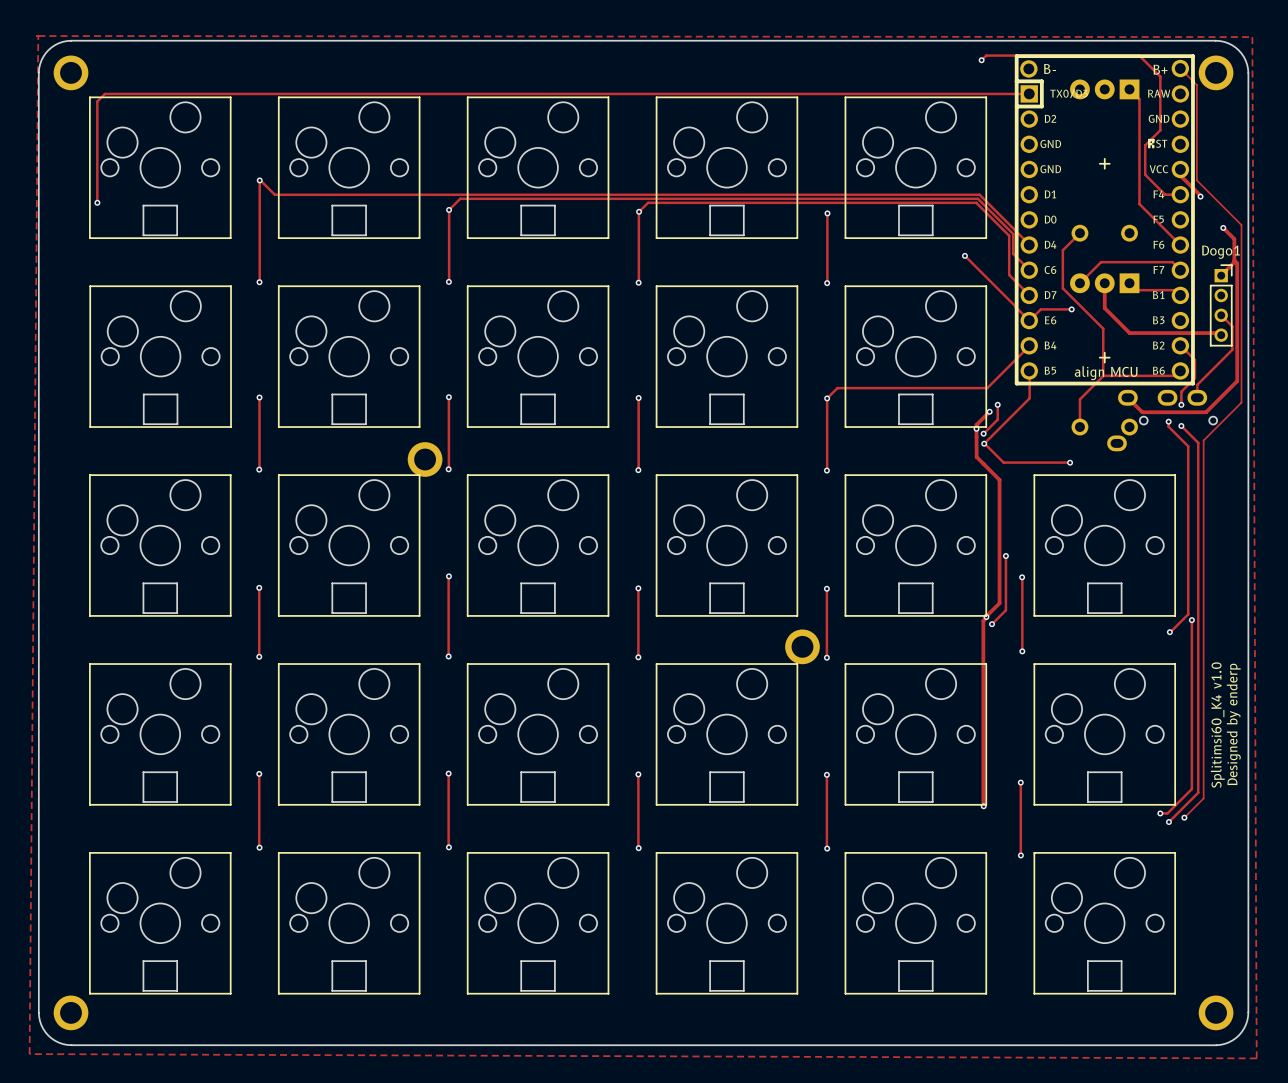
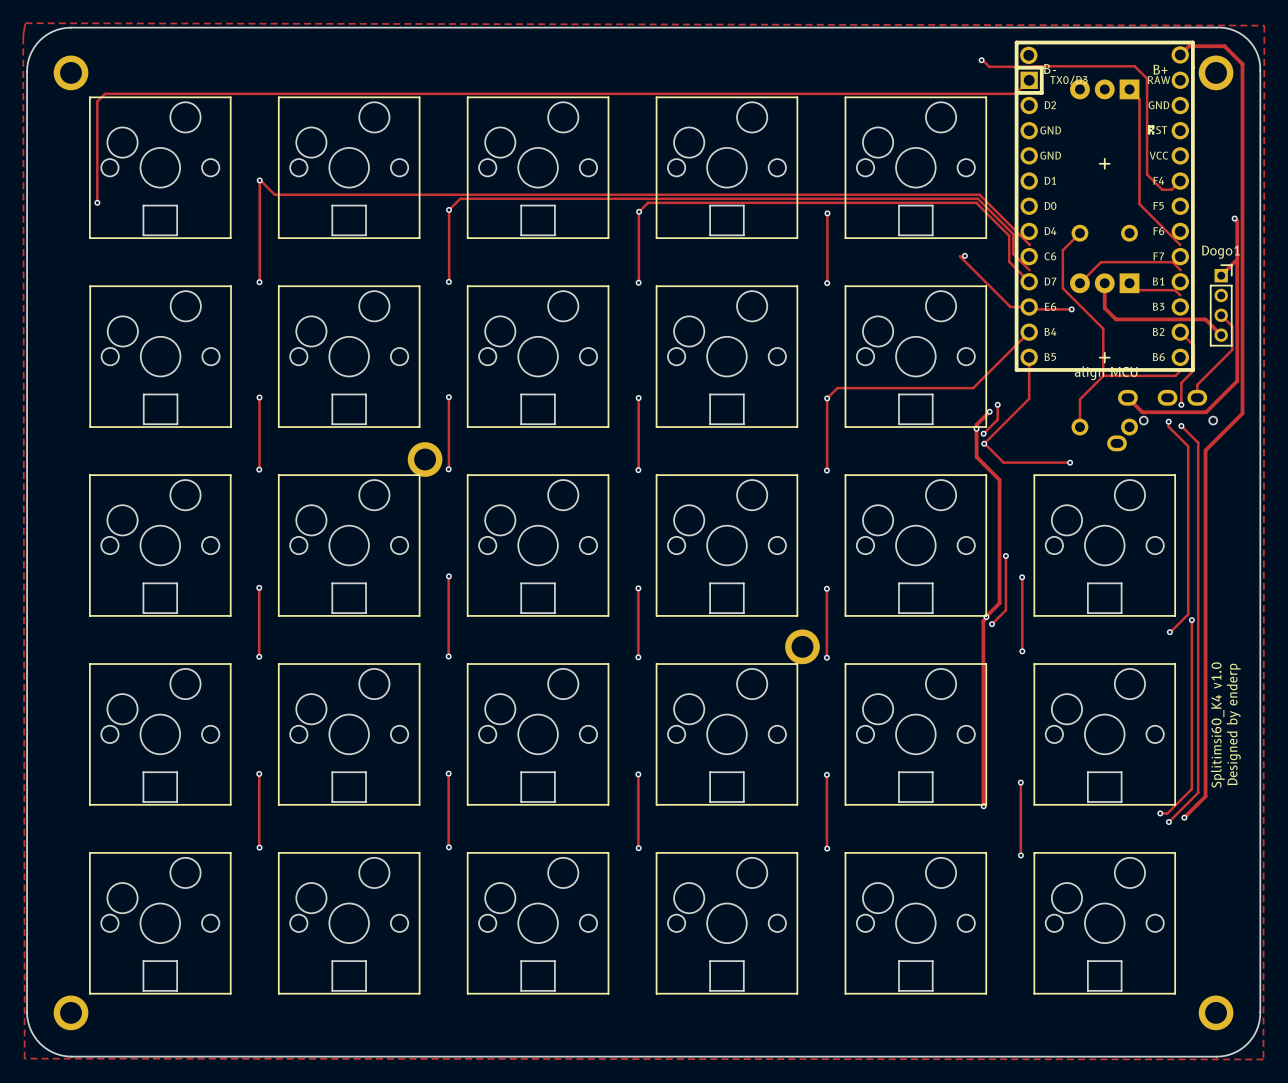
zone outline: (36, 36) (1252, 37) (1256, 1058) (29, 1054) (38, 36) (36, 36) -> (25, 23) (23, 41) (24, 1058) (1263, 1059) (1264, 25) (25, 23)
board edge: (71, 40) (1215, 40) (1224, 41) (1235, 47) (1245, 60) (1248, 73) (1248, 1012) (1247, 1020) (1241, 1032) (1228, 1042) (1216, 1045) (71, 1045) (59, 1042) (51, 1038) (43, 1029) (38, 1012) (38, 72) (41, 60) (48, 50) (58, 43) (71, 40) -> (1216, 27) (71, 27) (56, 30) (43, 37) (31, 52) (27, 72) (27, 1012) (29, 1027) (36, 1040) (52, 1052) (71, 1056) (1216, 1056) (1231, 1054) (1244, 1046) (1256, 1031) (1260, 1012) (1260, 65) (1256, 51) (1247, 39) (1235, 31) (1216, 27)
track: (981, 60) (986, 55) (1139, 55) (1160, 76) (1160, 130) (1145, 145) (1145, 174) (1165, 194) (1180, 194) -> none
track: none -> (984, 62) (989, 66) (1134, 66) (1147, 78) (1147, 174) (1162, 189) (1171, 189) (1180, 181)
part position: (1028, 68) -> (1028, 55)
track: (1180, 68) (1196, 85) (1196, 180) (1241, 225) (1241, 402) (1203, 440) (1203, 798) (1184, 817) -> (1180, 54) (1188, 46) (1224, 46) (1242, 64) (1242, 413) (1205, 450) (1205, 796) (1184, 817)
part position: (1180, 68) -> (1180, 54)
track: (104, 93) (1029, 93) -> (104, 93) (1015, 93) (1029, 80)
track: (1180, 169) (1180, 175) (1200, 196) -> none
via: (1200, 196) -> none
part position: (1104, 219) -> (1104, 206)
track: (1223, 227) (1234, 239) (1234, 260) (1237, 263) -> (1234, 218) (1237, 221) (1237, 263)
via position: (1223, 227) -> (1234, 218)
track: (964, 255) (1029, 320) -> none
track: (1009, 261) (1009, 275) (1029, 295) -> (1009, 261) (1029, 281)
track: (1040, 309) (1029, 320) -> (1040, 309) (1010, 306) (960, 255)
track: (1116, 319) (1129, 333) (1219, 333) -> (1116, 319) (1205, 319) (1219, 333)
track: (1029, 345) (987, 388) (973, 388) -> (1029, 332) (973, 388)
track: (1180, 345) (1194, 359) (1194, 378) (1181, 391) -> (1180, 332) (1193, 345) (1193, 370) (1181, 382) (1181, 391)
track: (1029, 370) (1029, 398) -> (1029, 357) (1029, 398)

